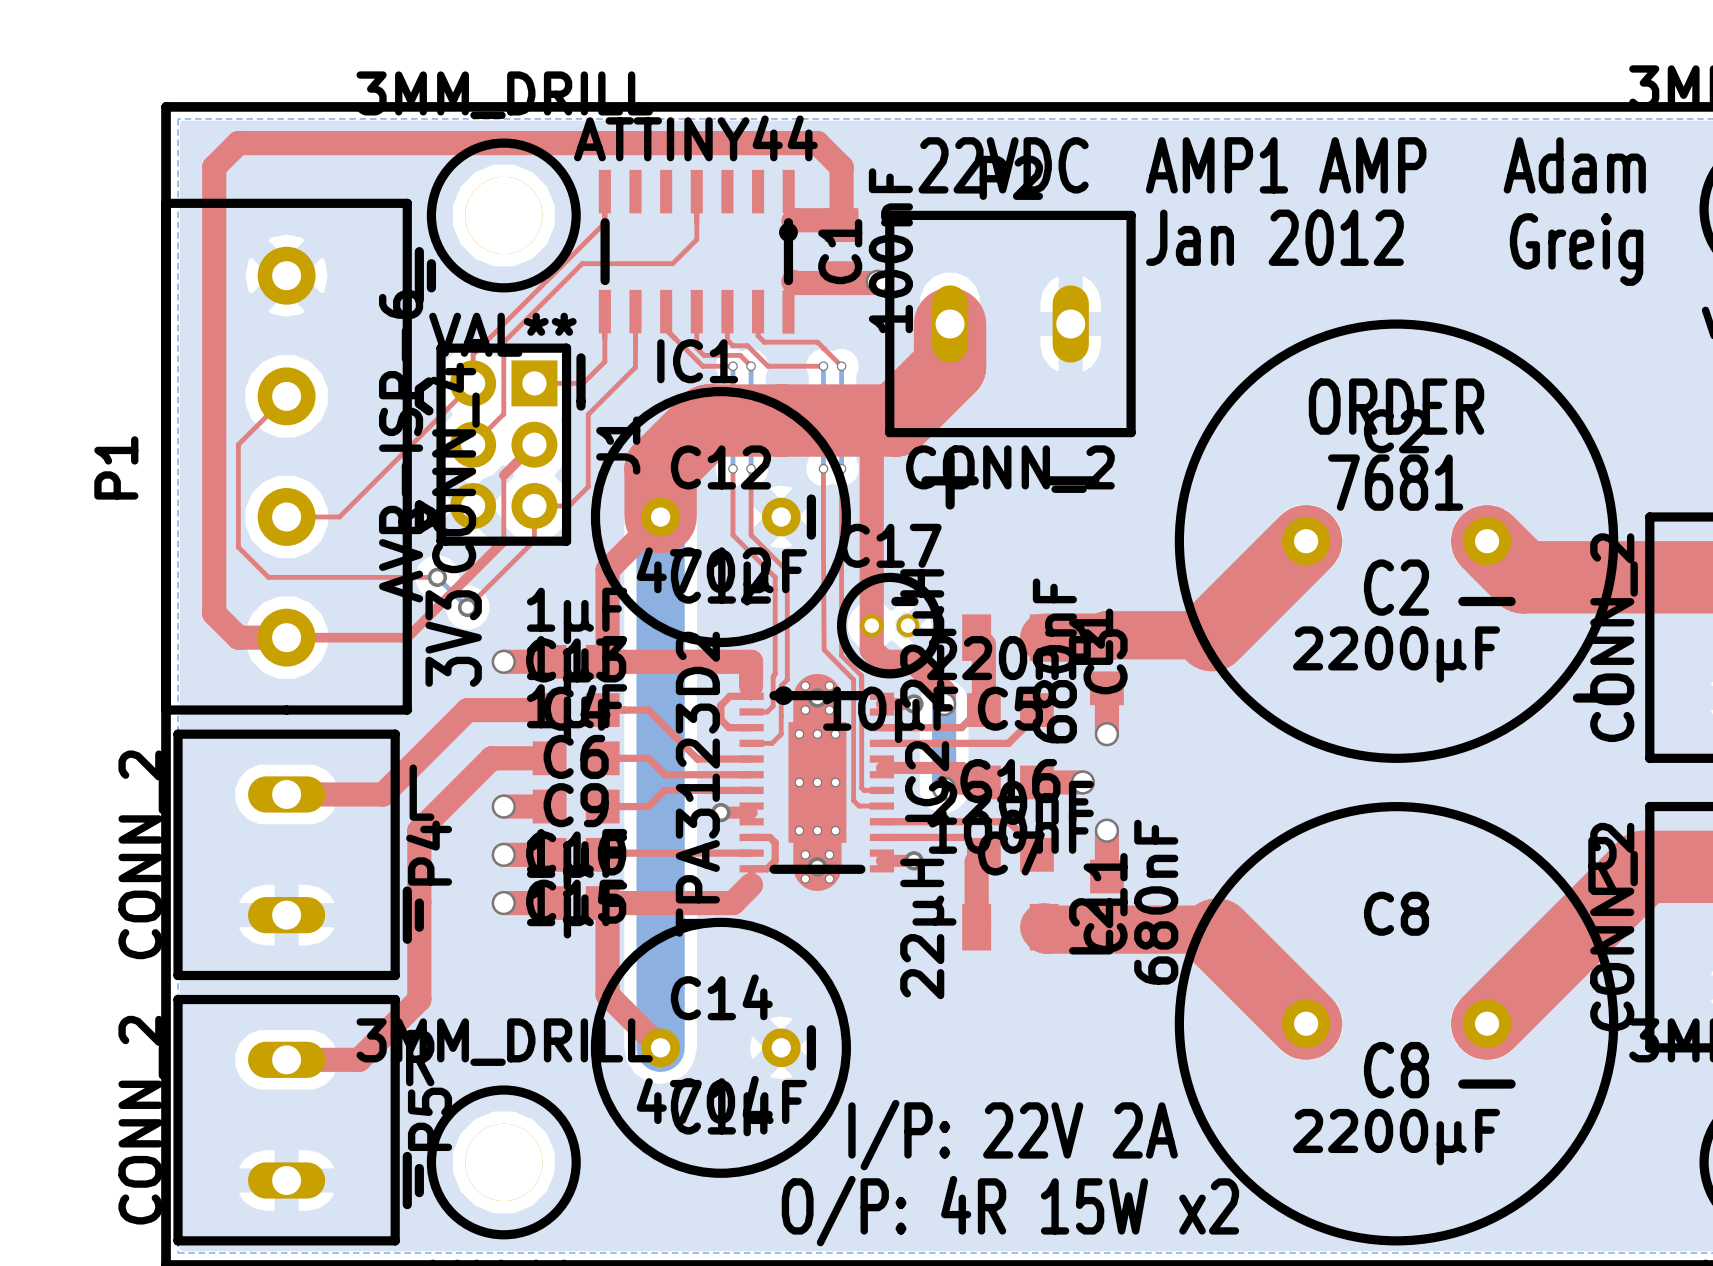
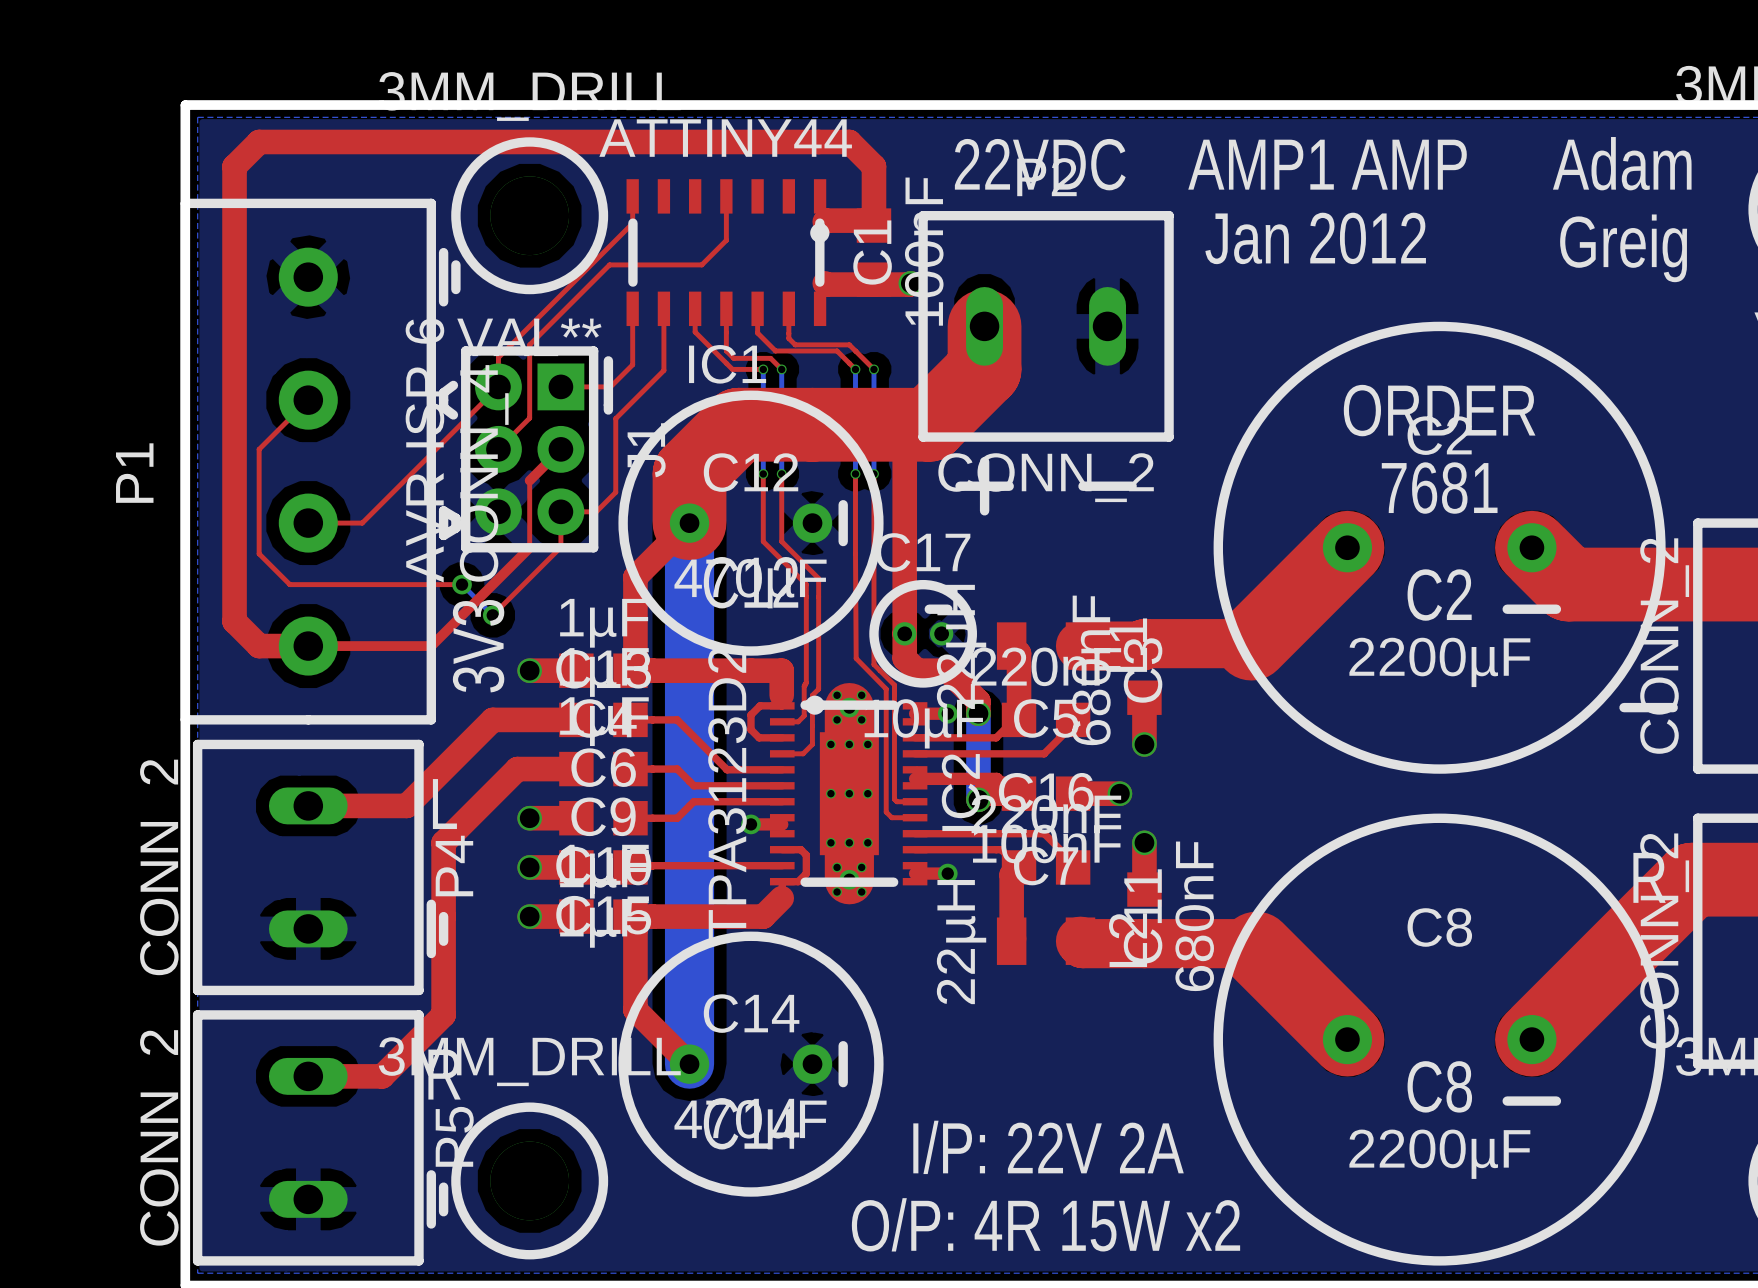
IC1 footprint: [598, 169, 798, 334] -> [626, 179, 830, 327]
top track: (727, 330) (727, 340) (733, 345) (747, 345) (767, 366) (823, 366) -> (757, 333) (775, 350) (837, 350) (855, 369)

